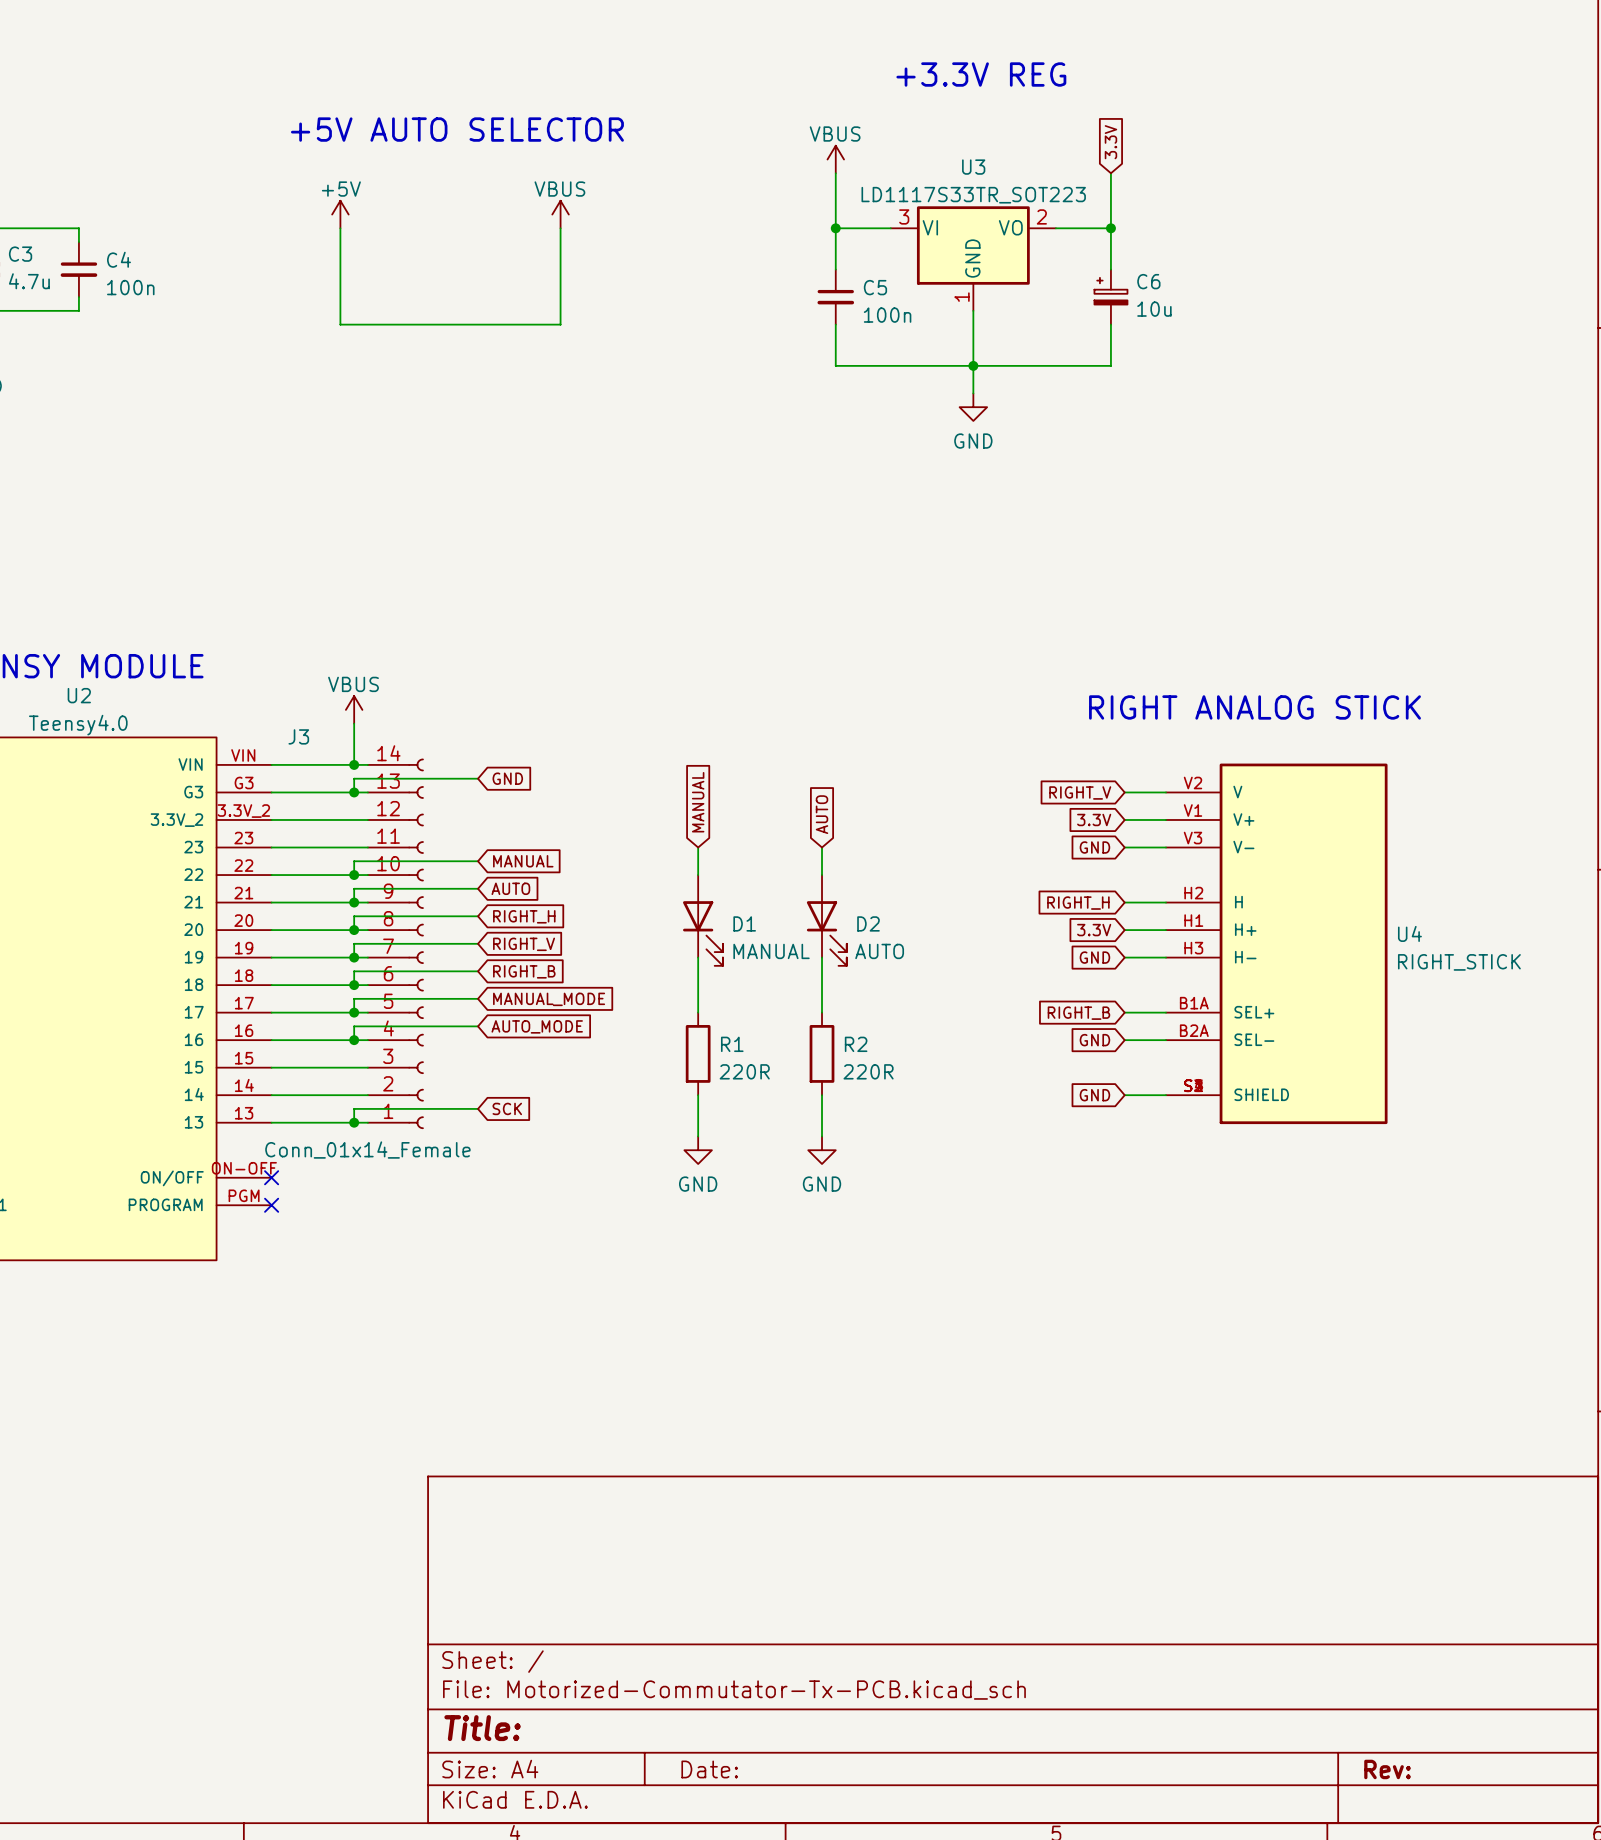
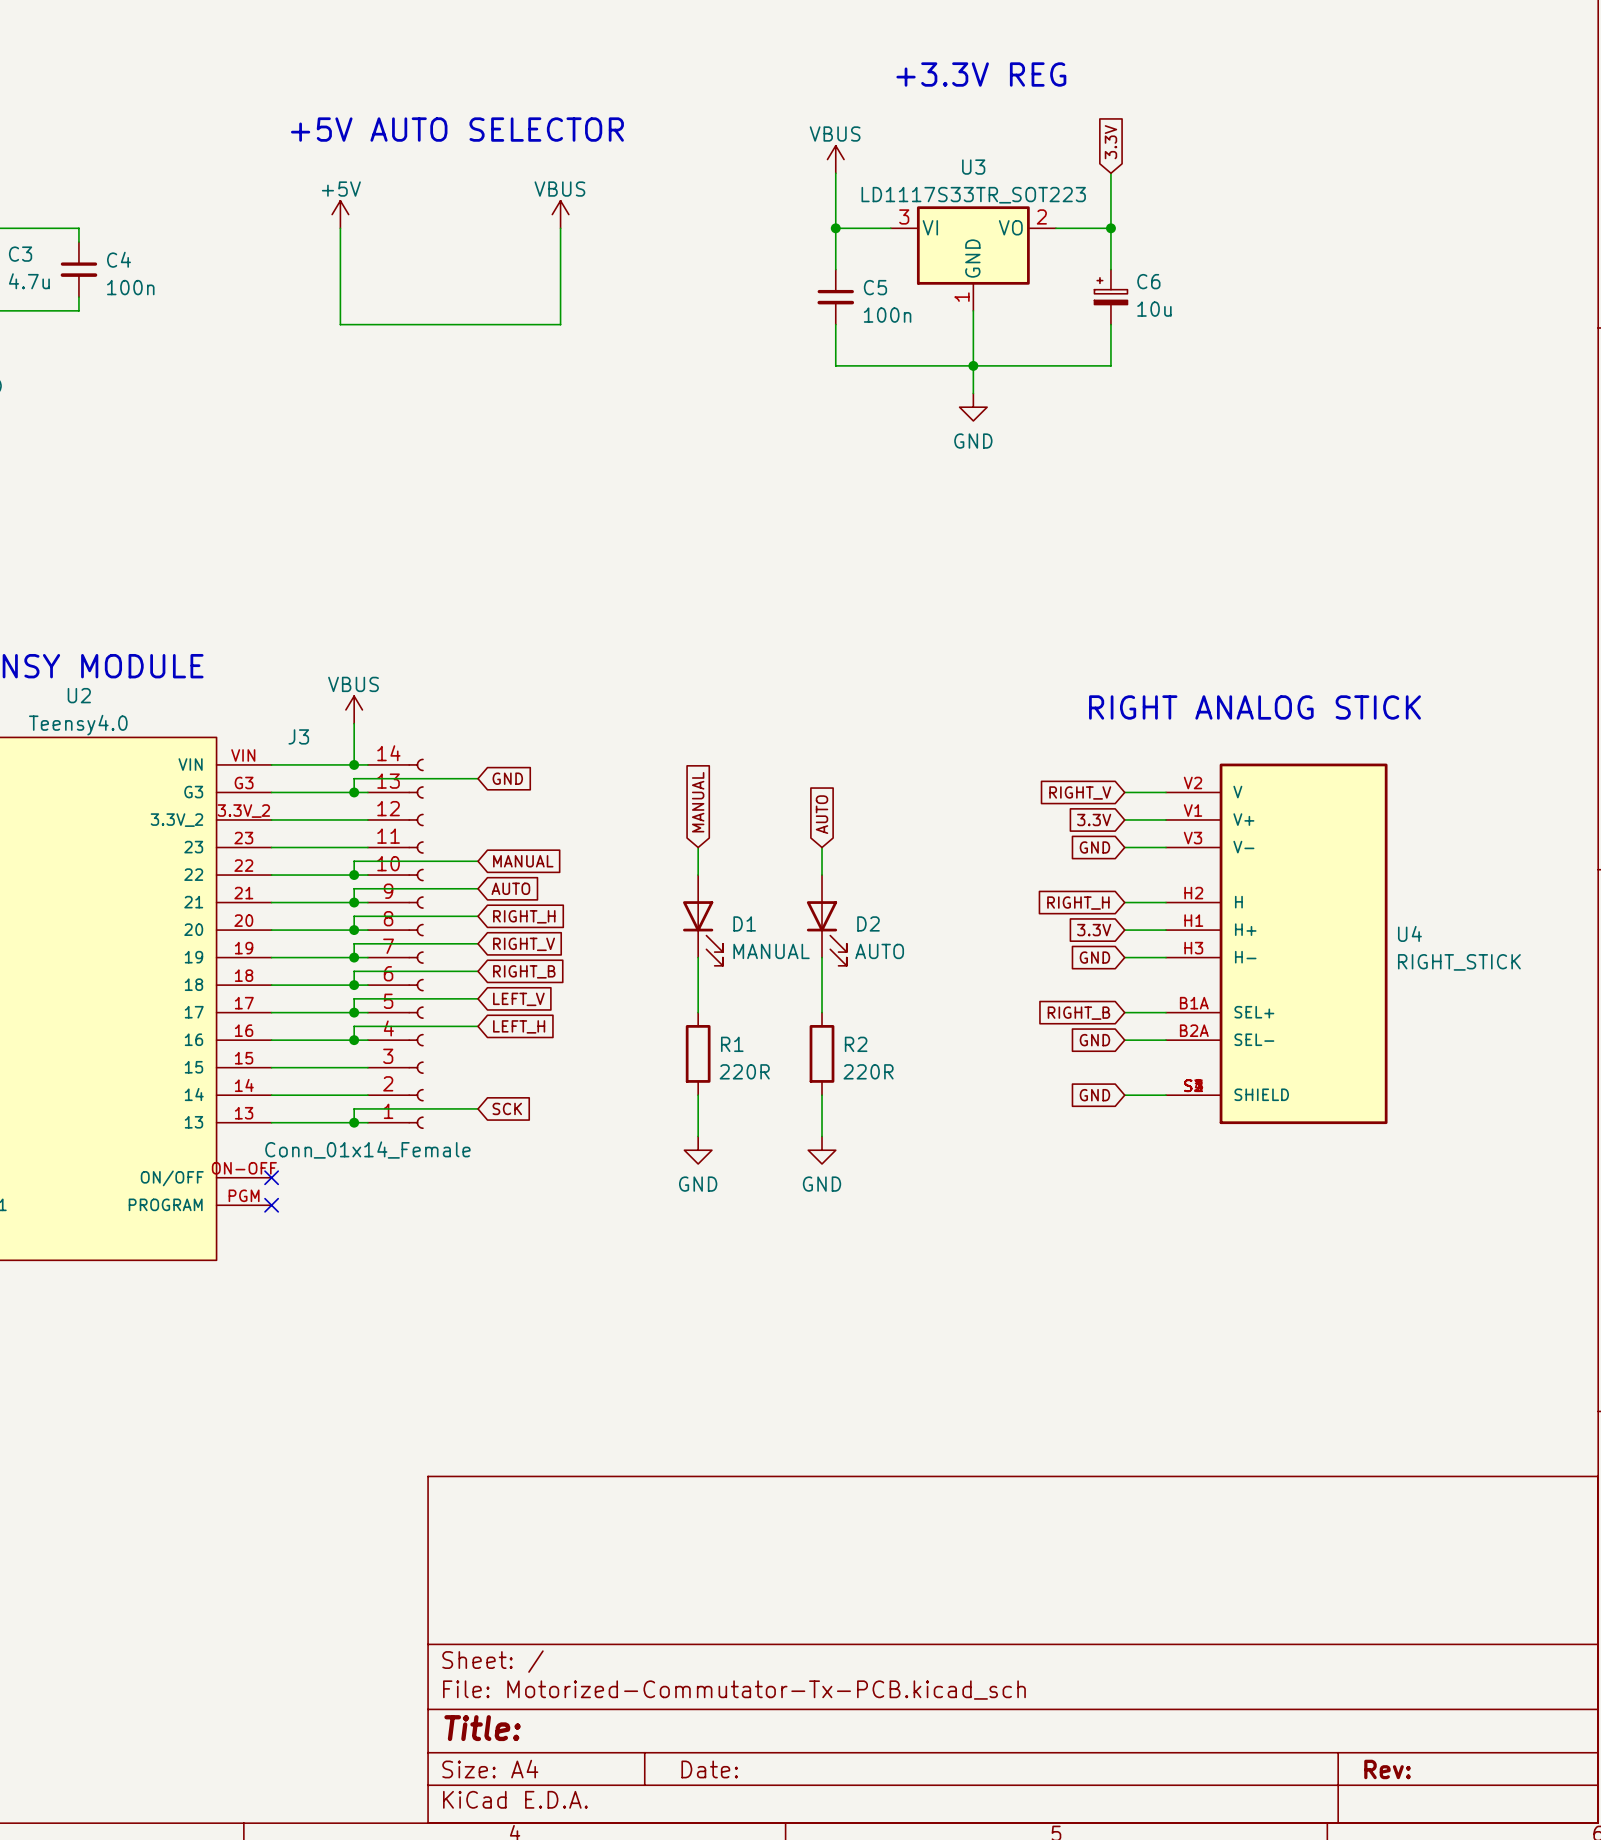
global label: MANUAL_MODE (549, 999) -> LEFT_V (518, 999)
global label: AUTO_MODE (537, 1026) -> LEFT_H (519, 1026)

